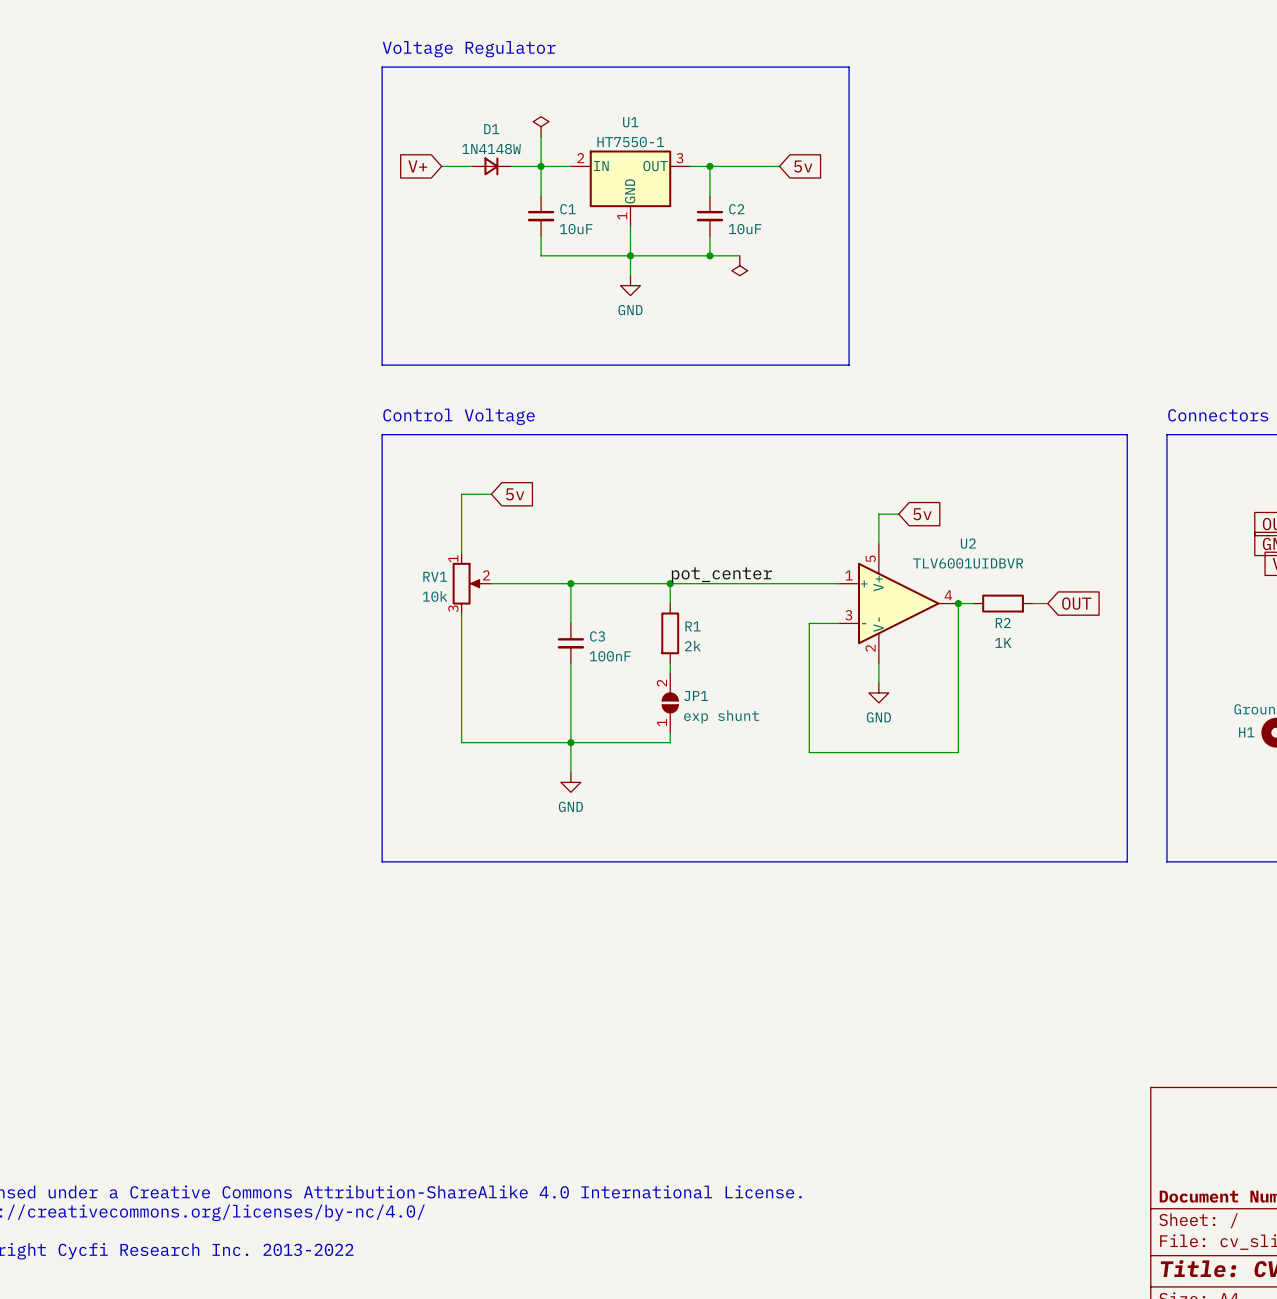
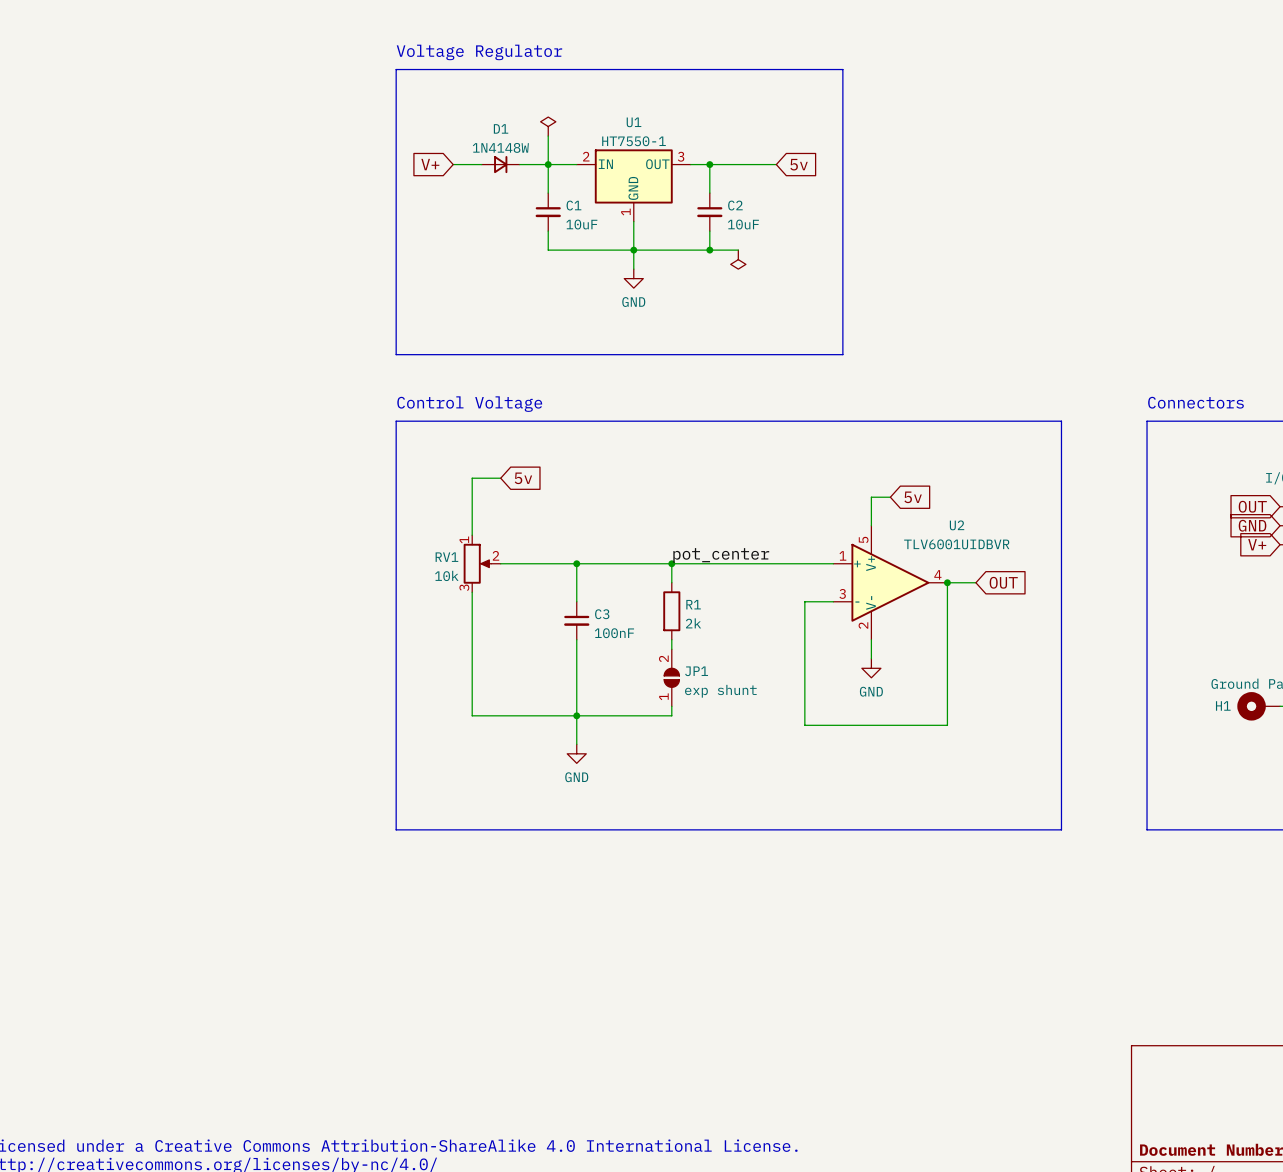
line: (1077, 434) (1127, 434) (1127, 861) (1077, 861) -> (1061, 421) (1061, 829)
R2: 1K (1003, 603) -> none
global label position: OUT (1076, 603) -> OUT (1003, 582)

